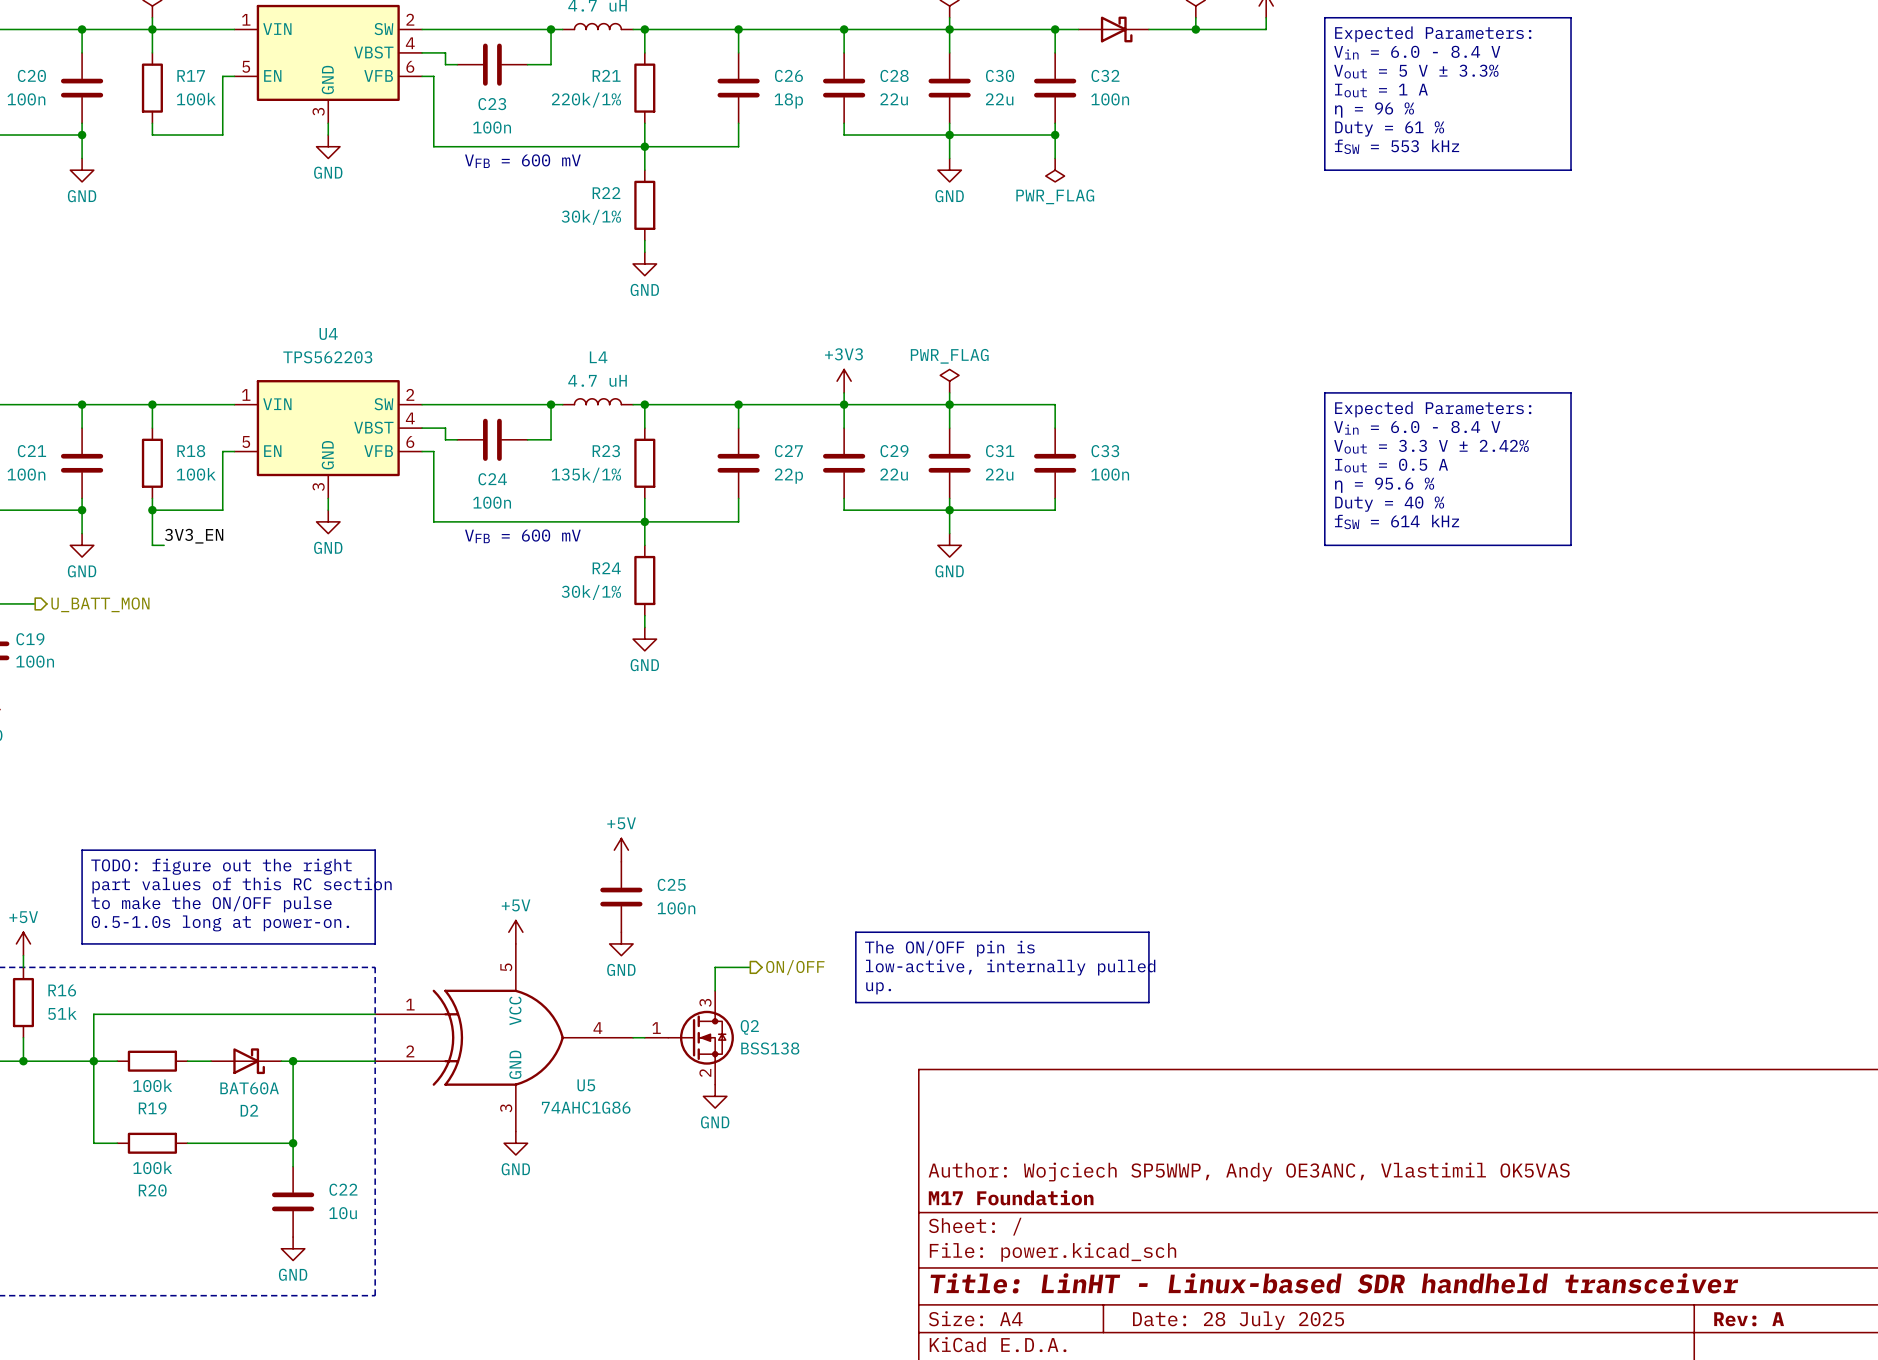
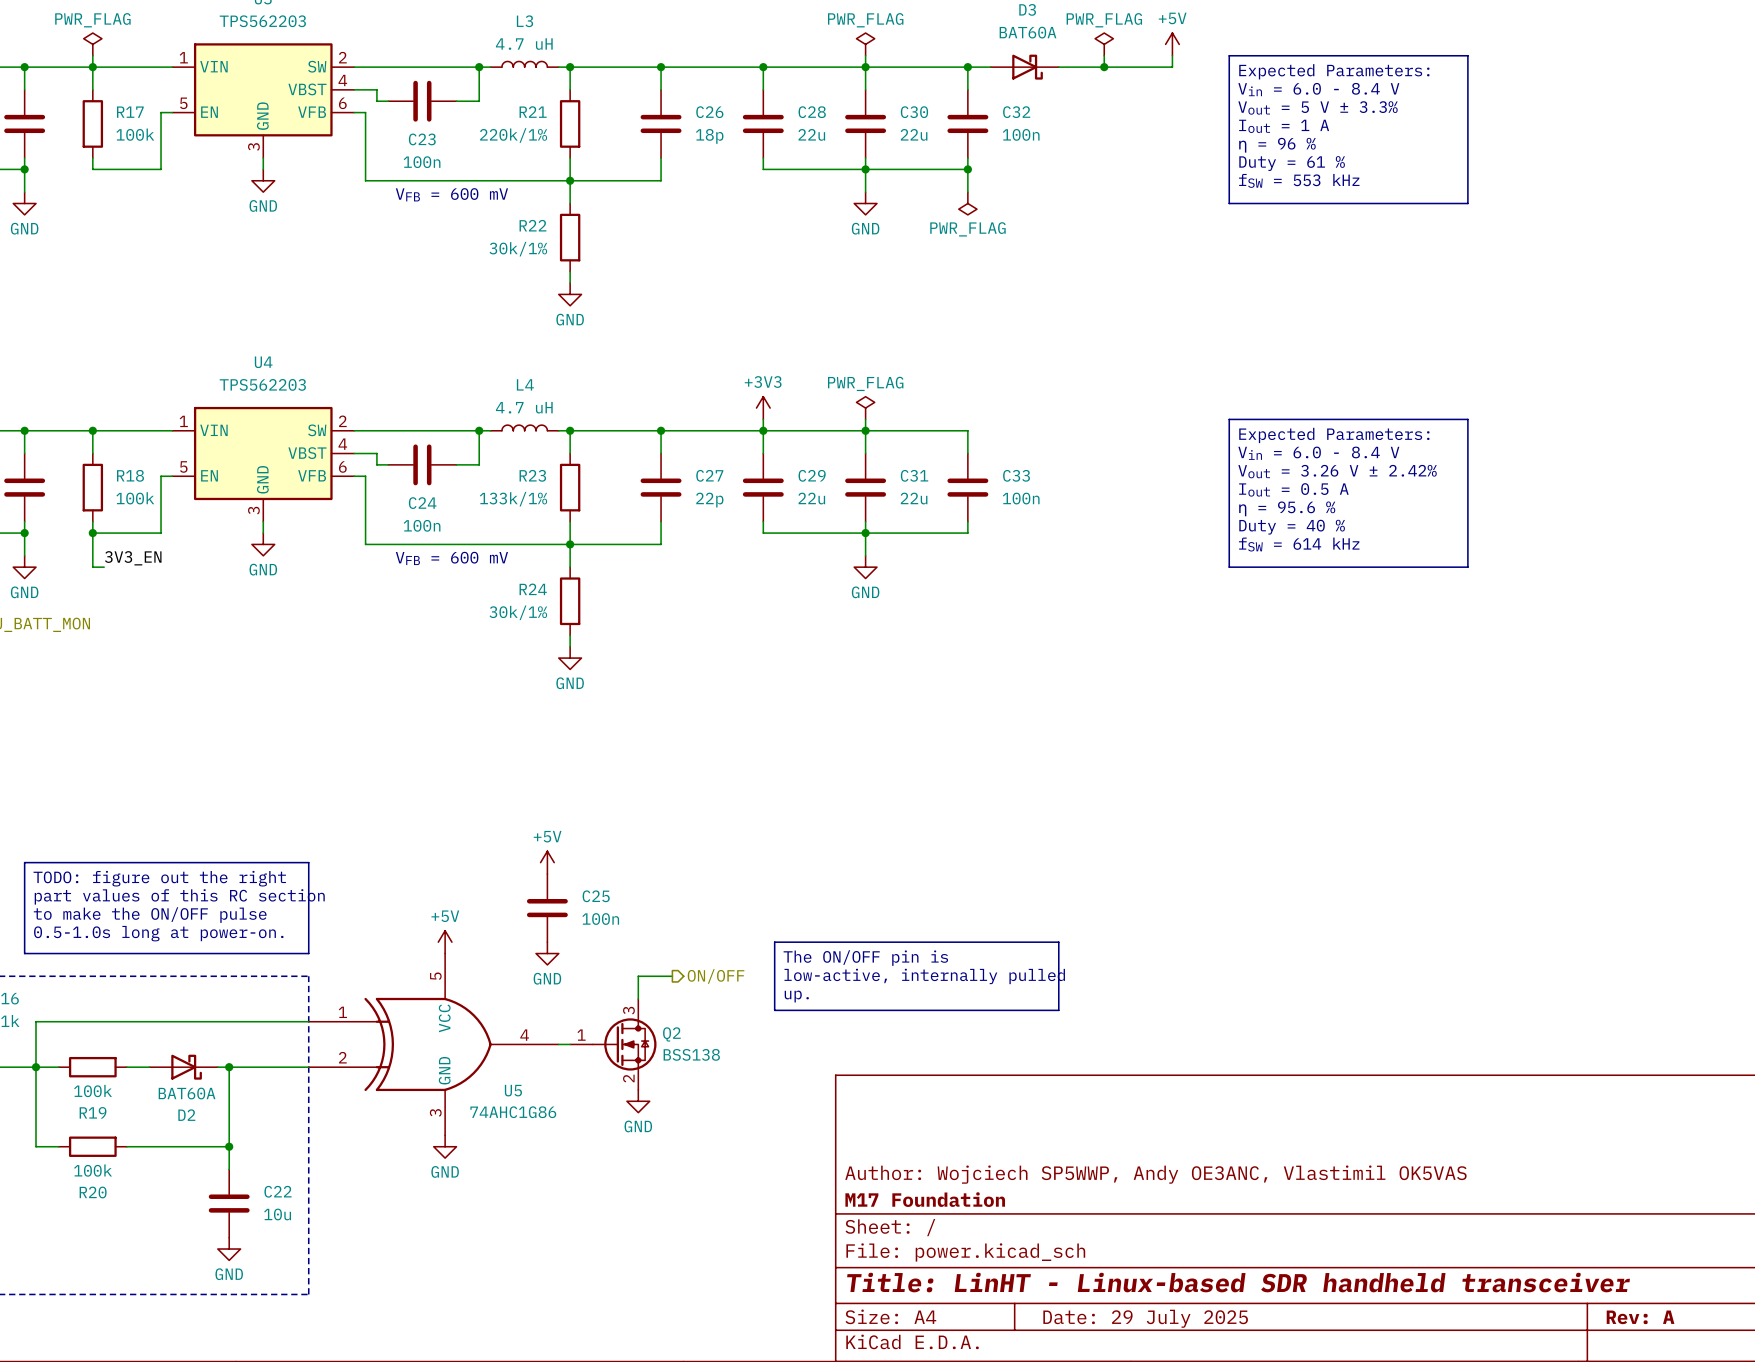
text: Vout = 3.3 V ± 2.42% (1431, 446) -> Vout = 3.26 V ± 2.42% (1337, 471)
R23 value: 135k/1% (586, 475) -> 133k/1% (513, 499)
title block: Date: 28 July 2025 (1238, 1320) -> Date: 29 July 2025 (1145, 1318)

